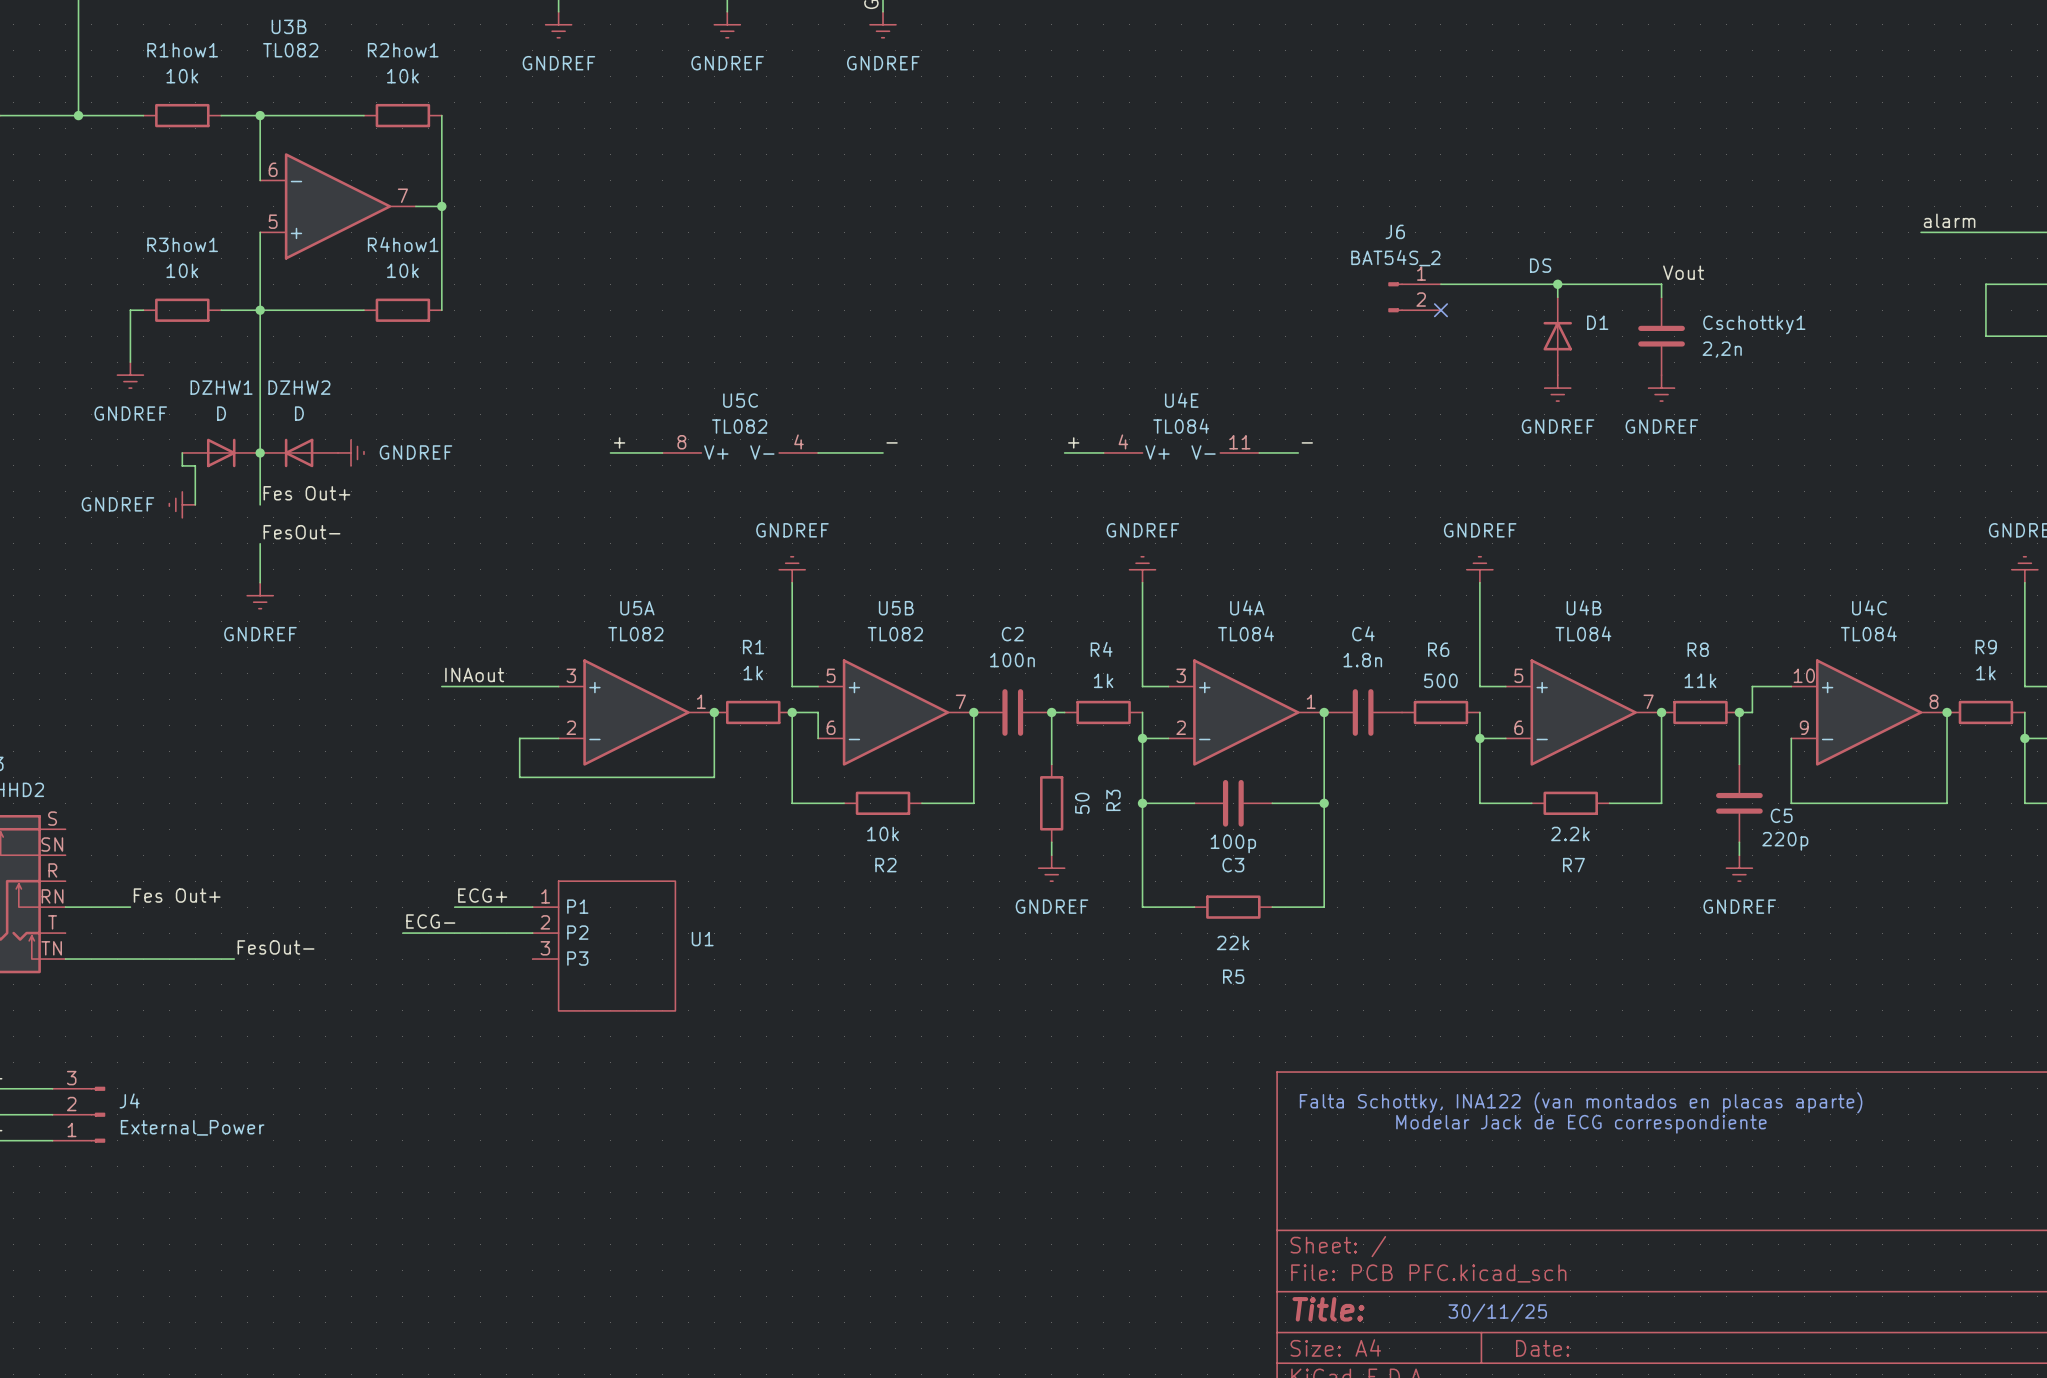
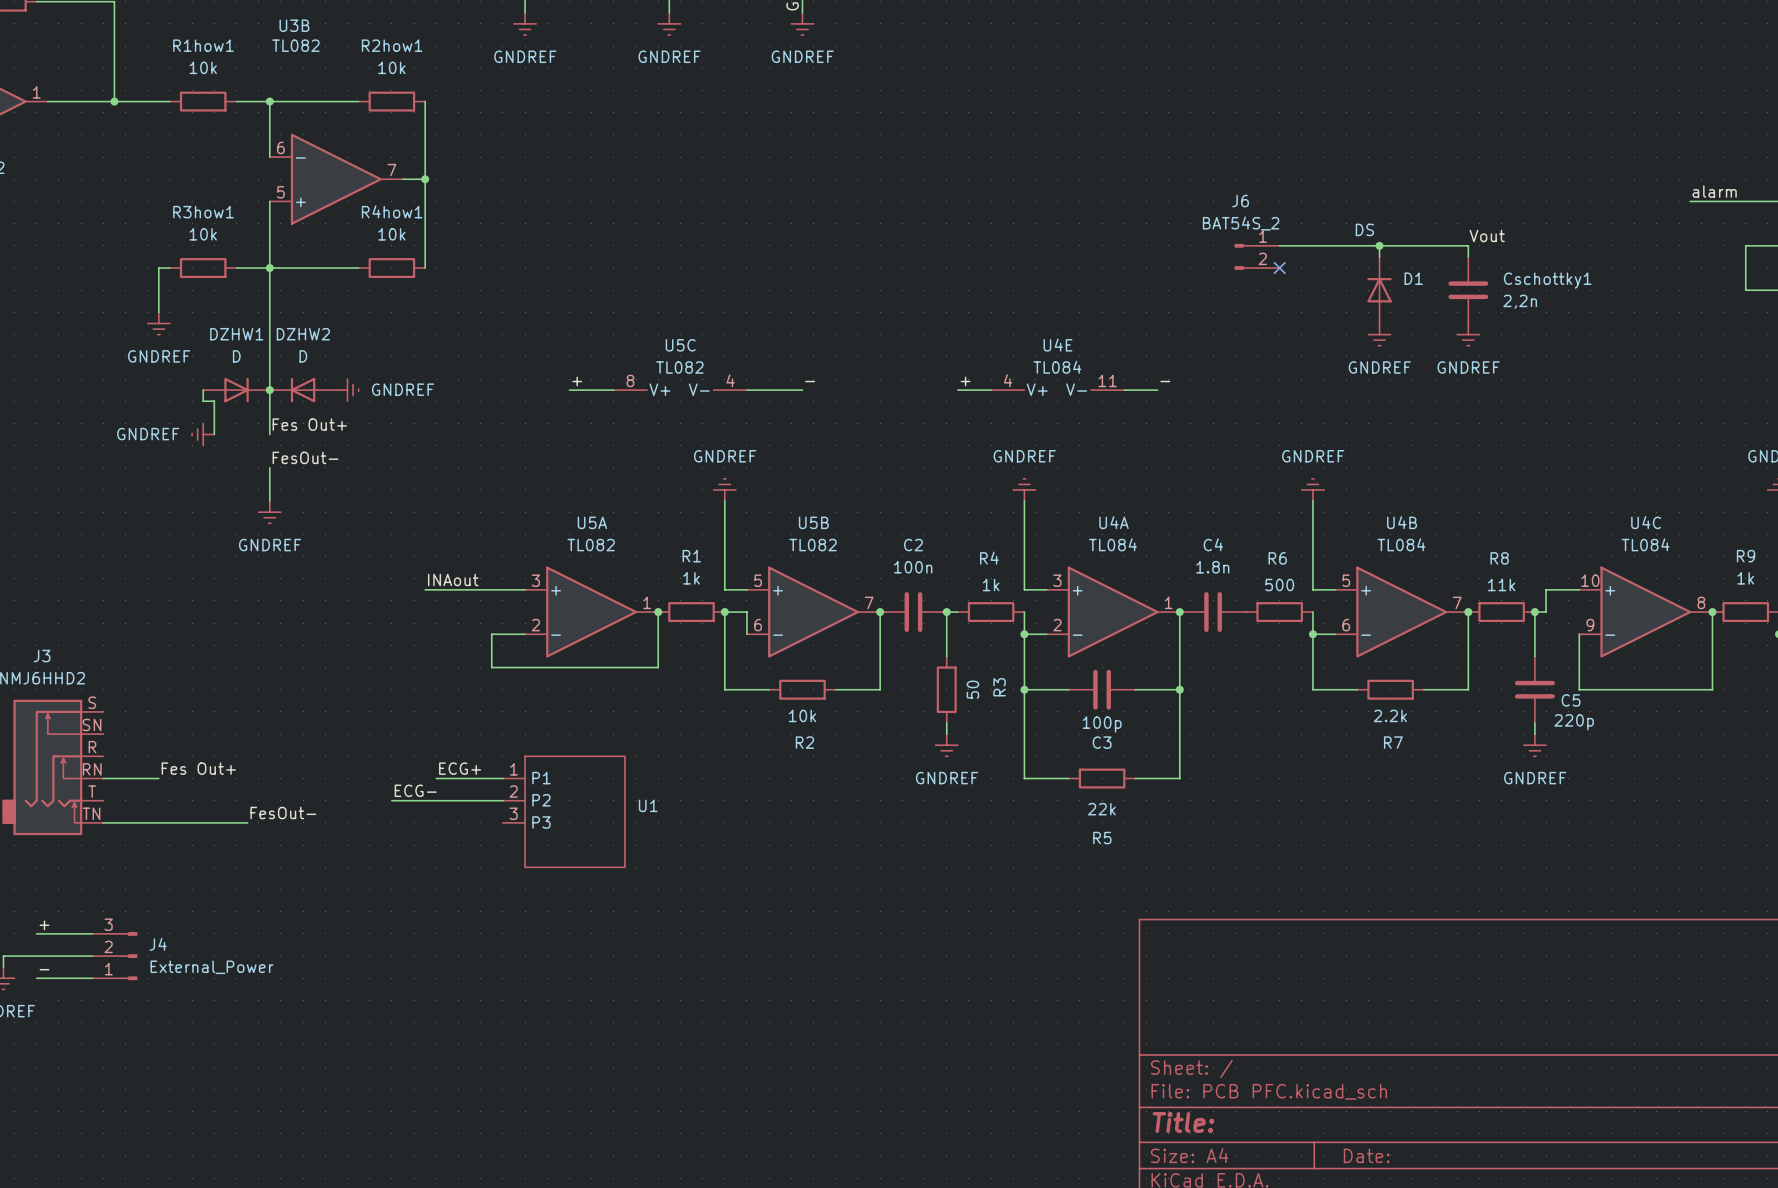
text: Falta Schottky, INA122 (van montados en placas aparte) (1581, 1102) -> none
text: Modelar Jack de ECG correspondiente (1581, 1124) -> none
text: 30/11/25 (1497, 1312) -> none

